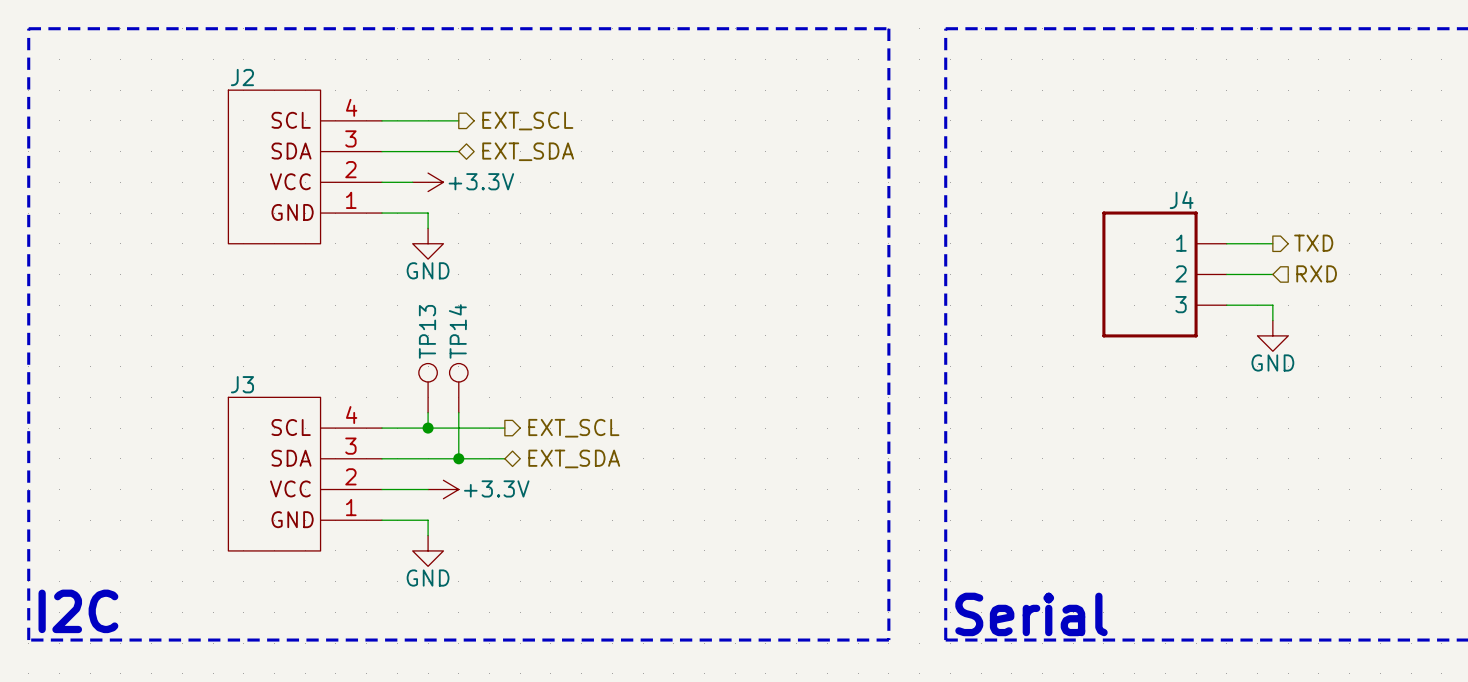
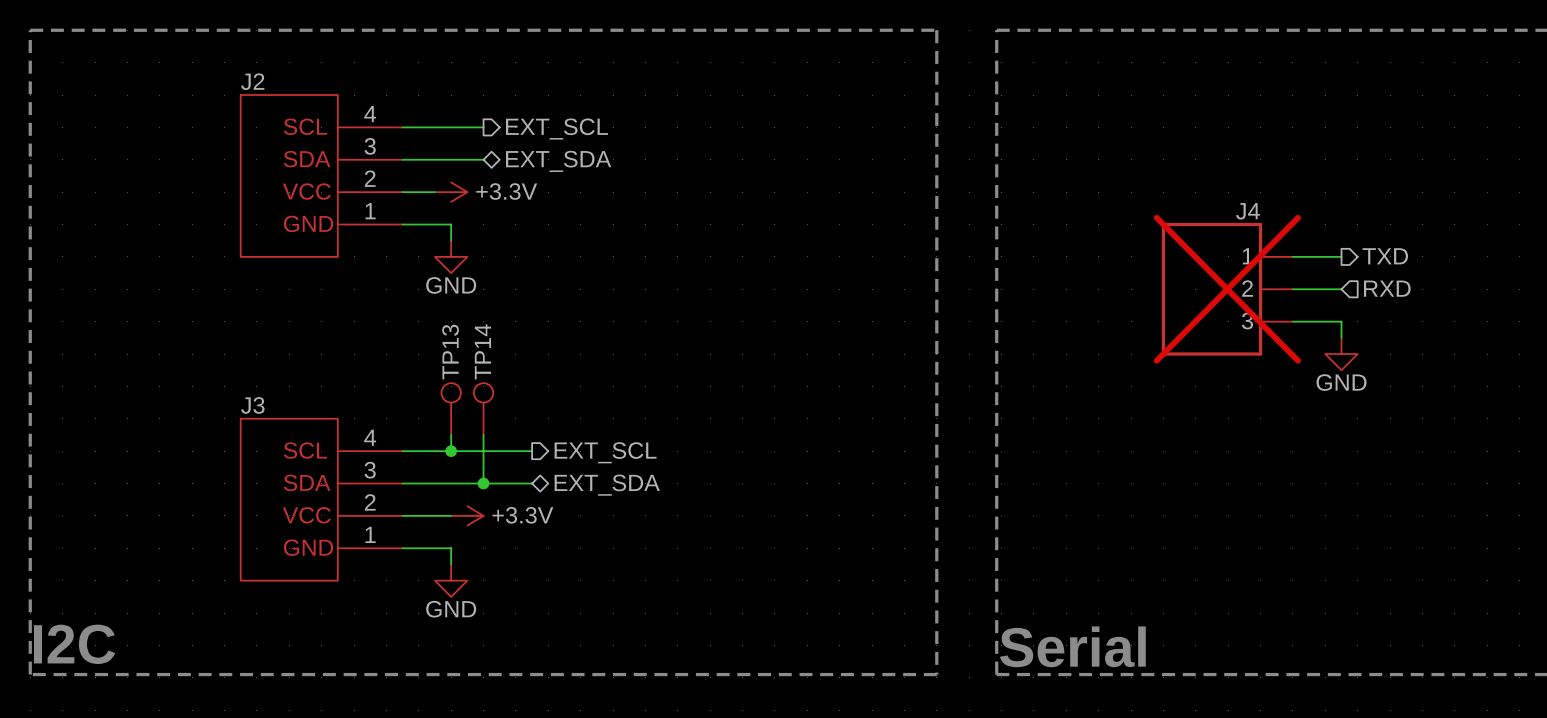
J4 do-not-place cross: none -> (1227, 289)

